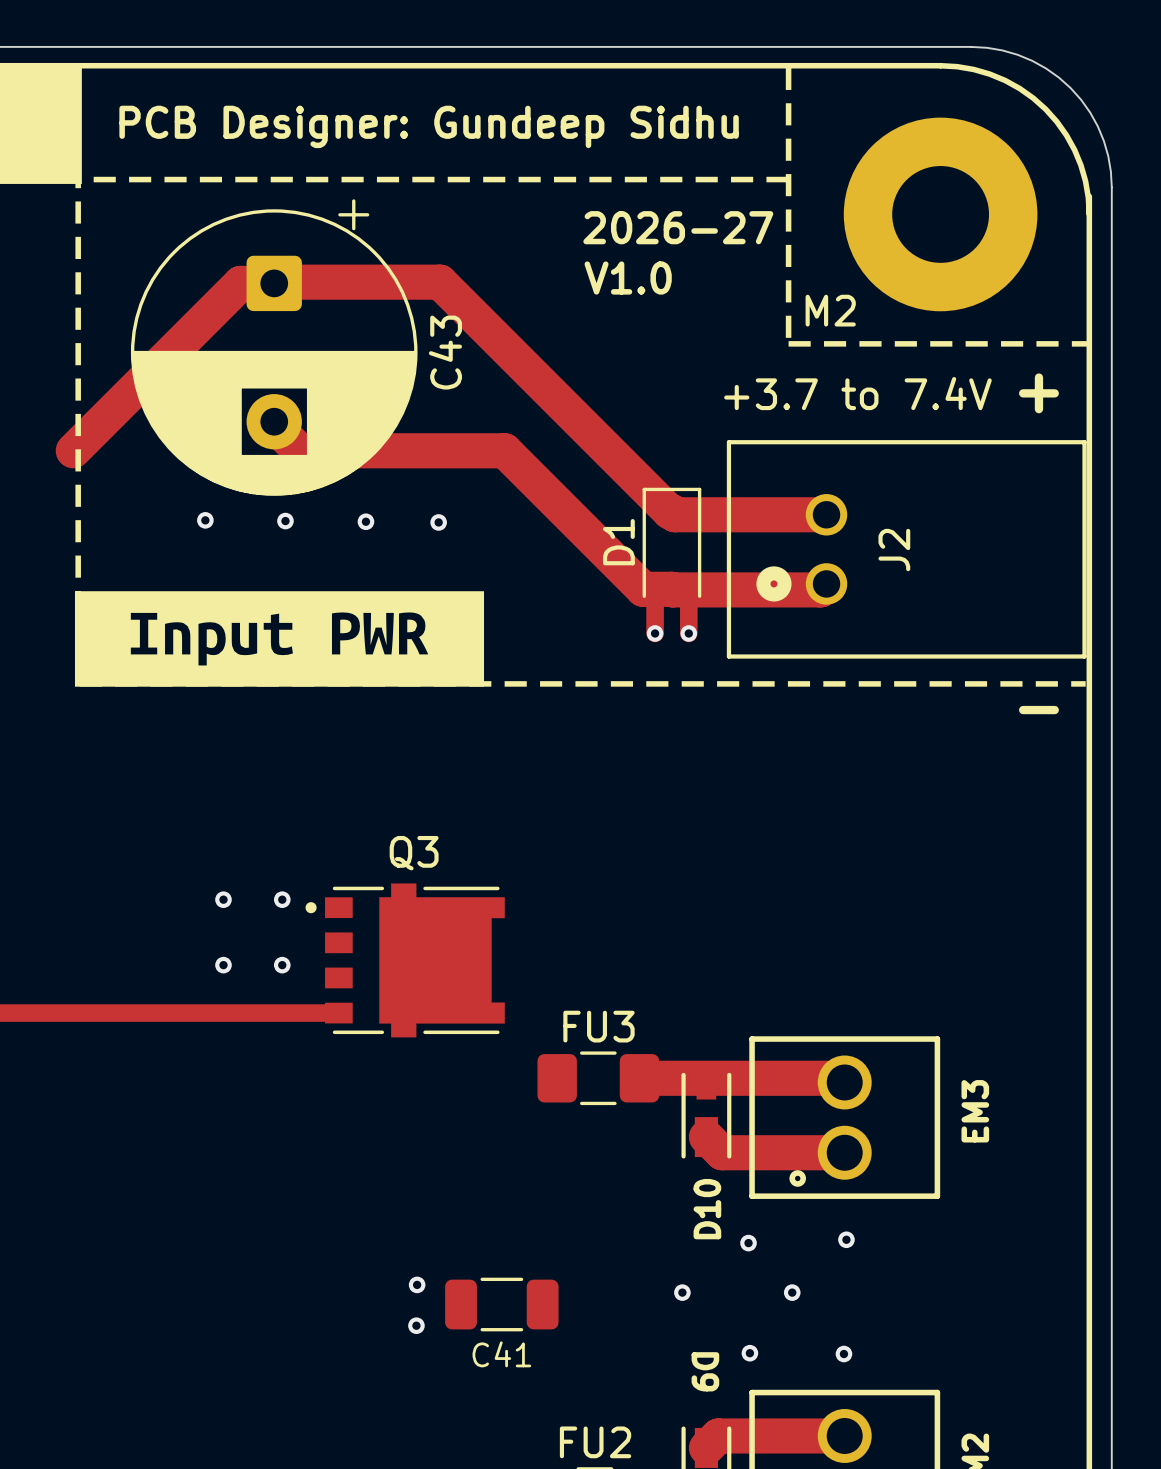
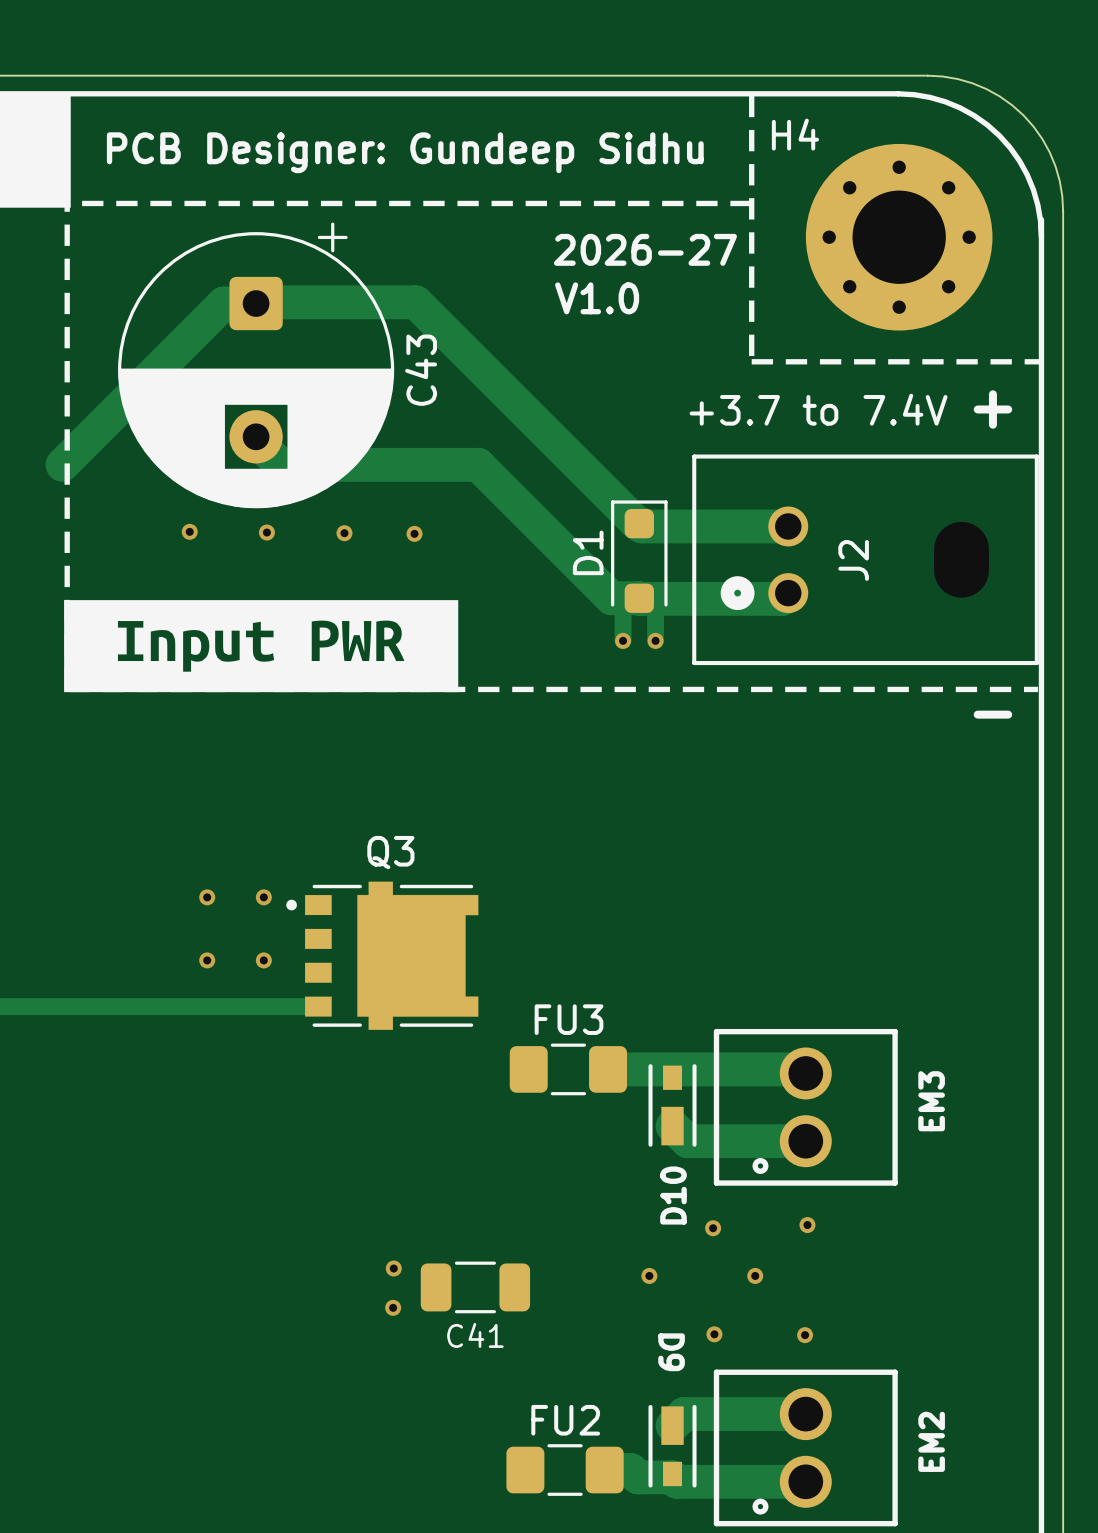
M2: (940, 214) -> none
H4: none -> (899, 237)

